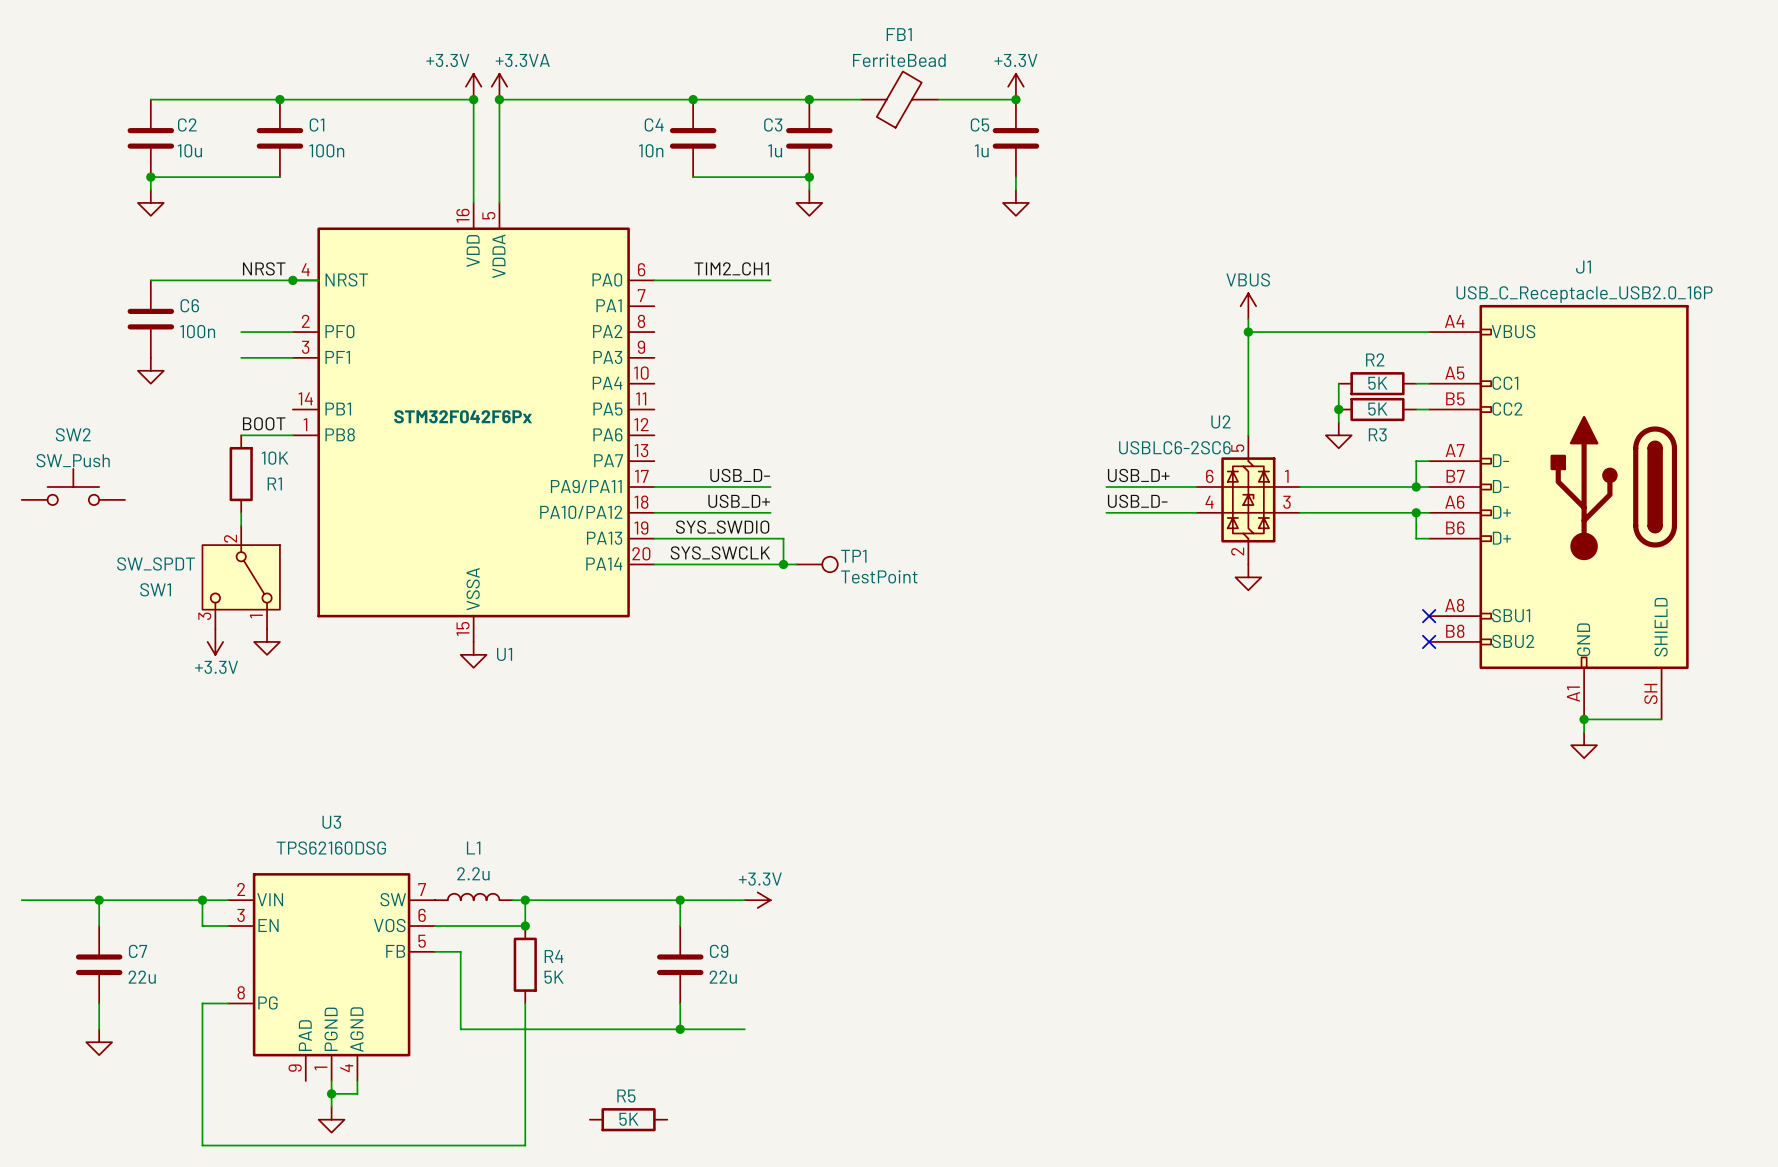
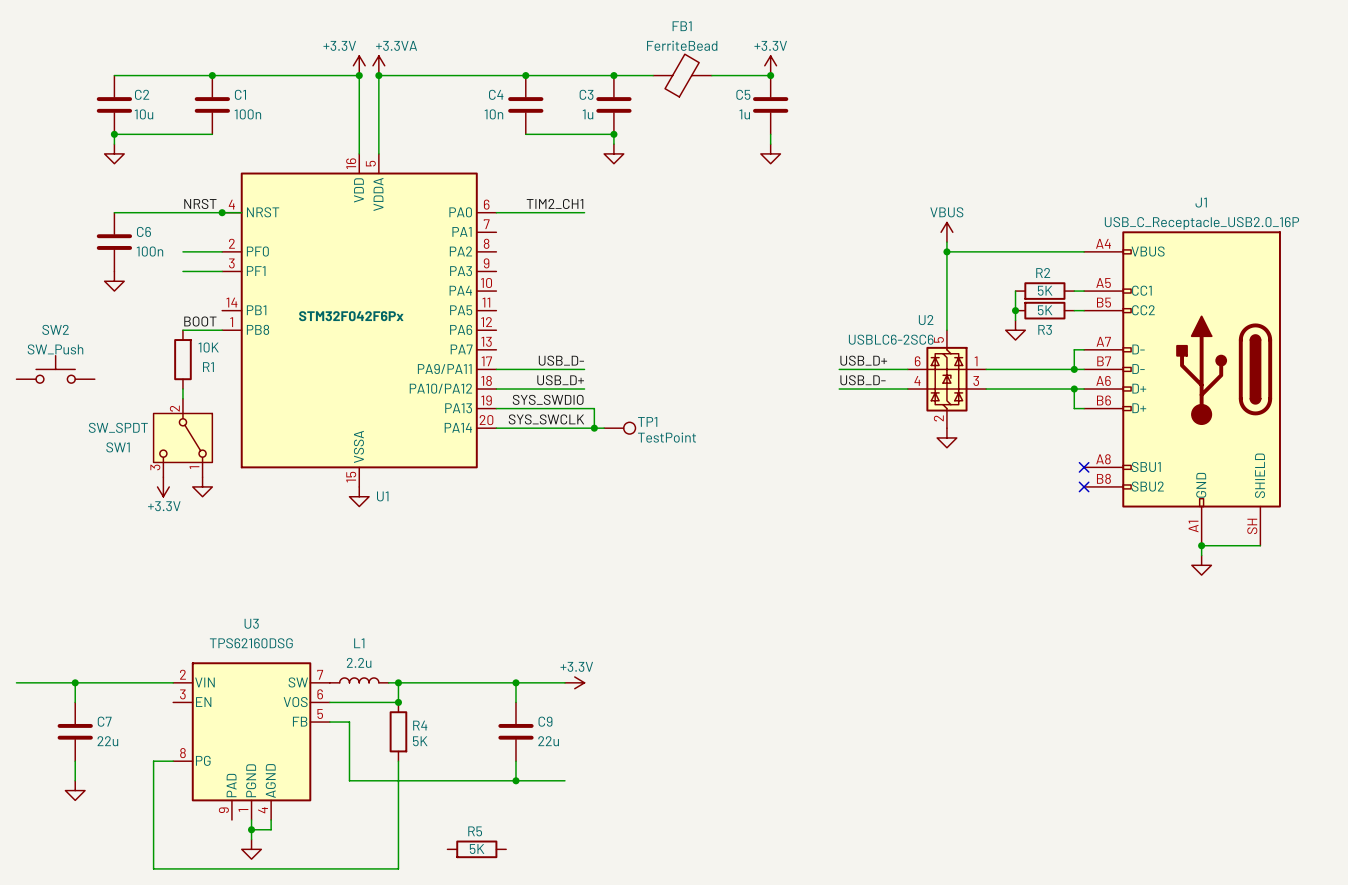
wire: (202, 900) (202, 926) (228, 926) -> none
junction: (202, 900) -> none

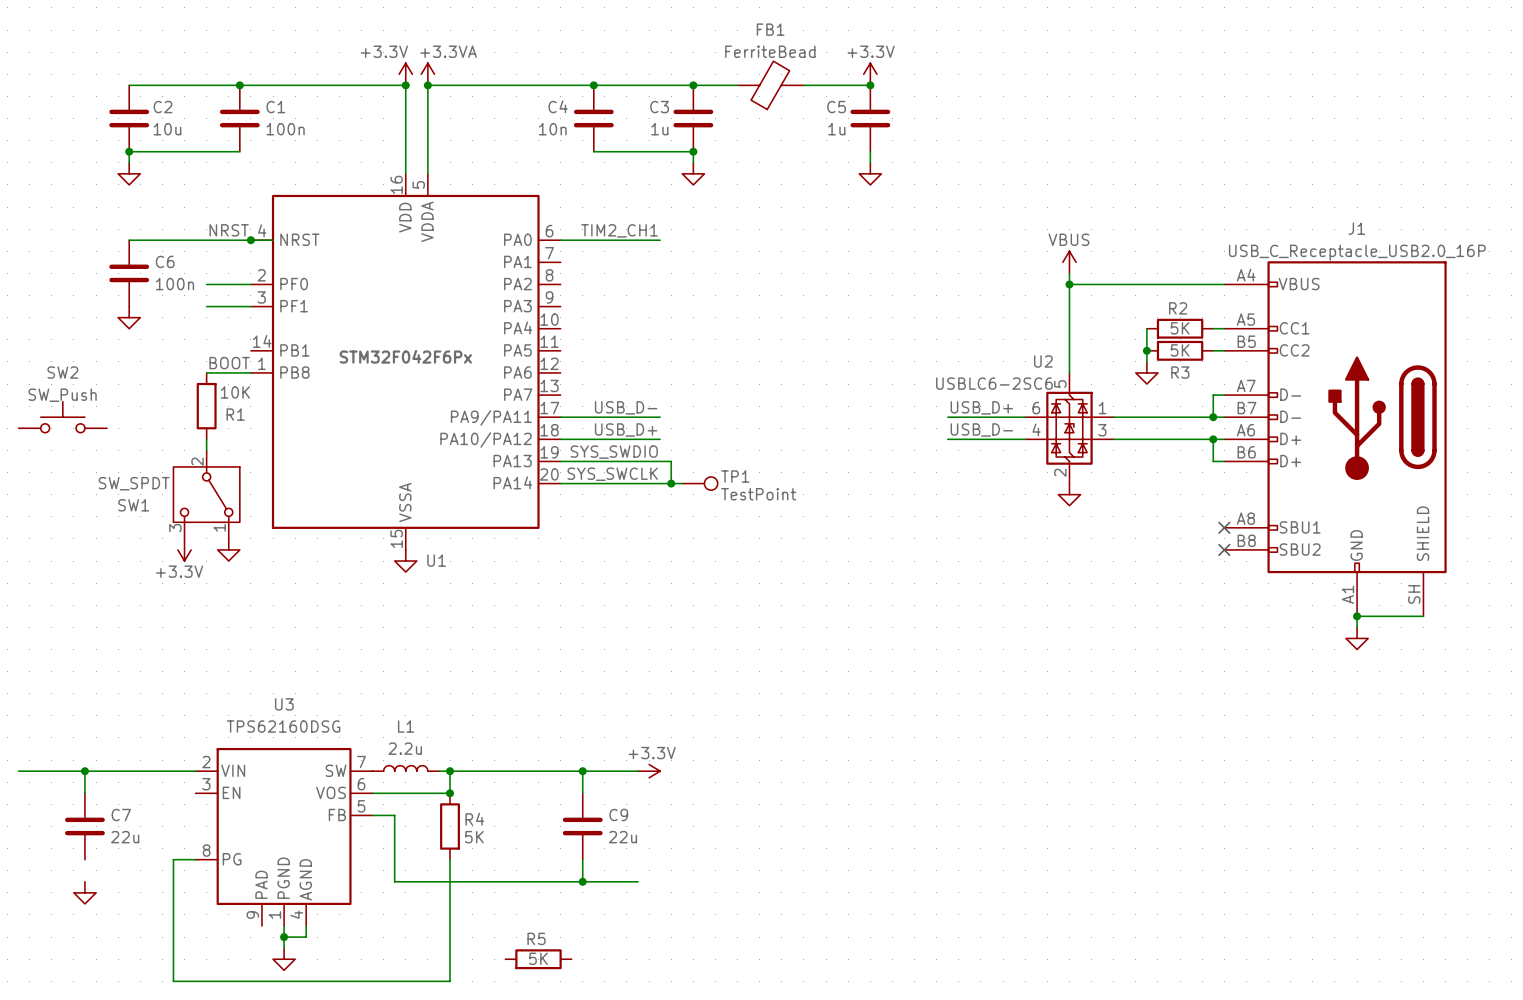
wire: (75, 761) (75, 780) -> none

